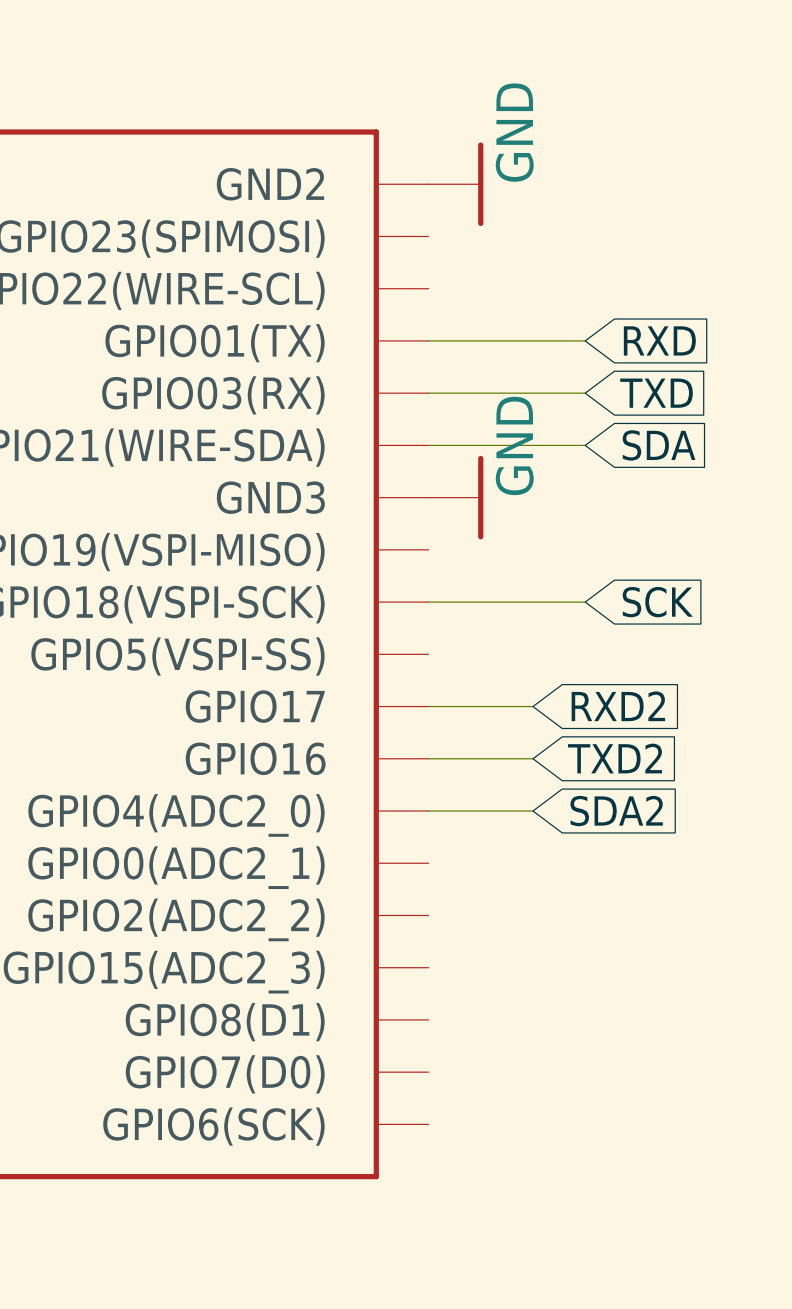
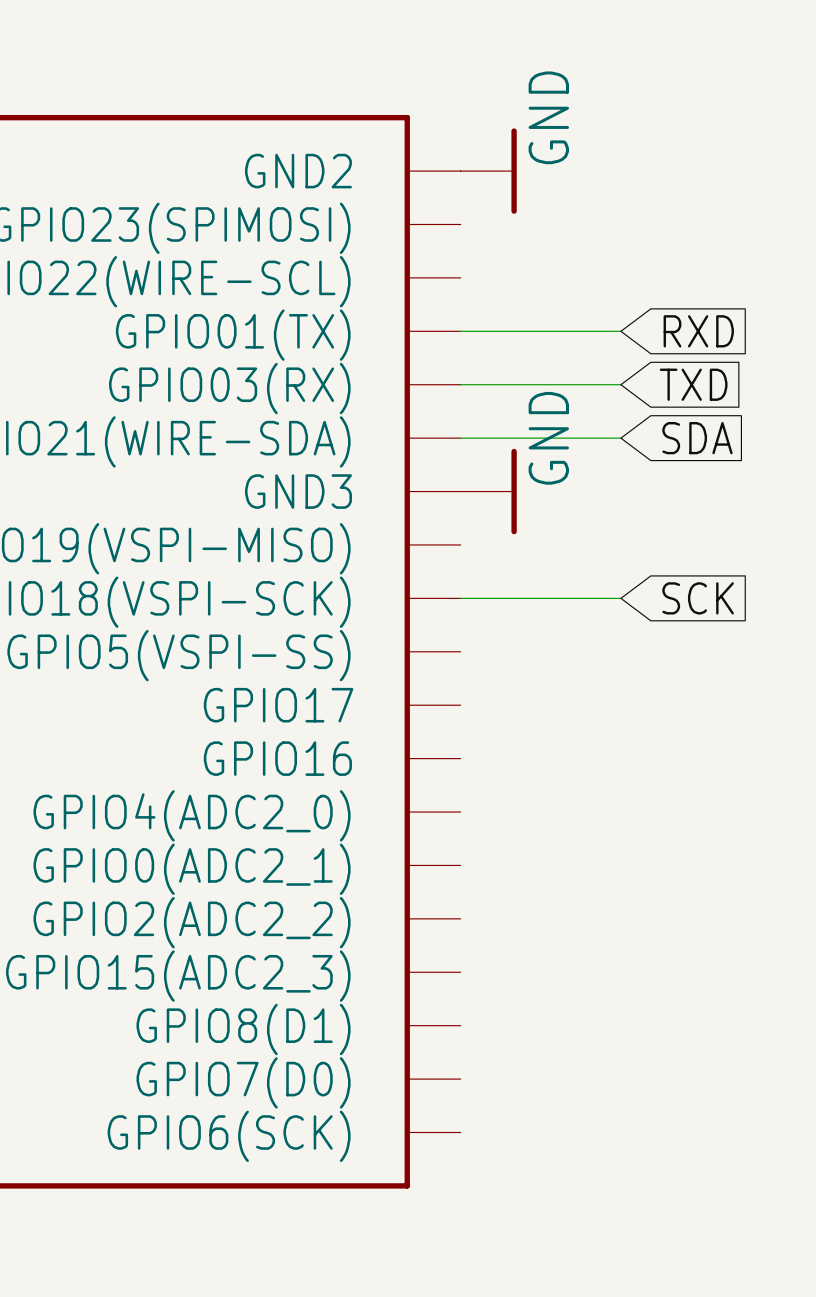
wire: (428, 706) (532, 706) -> none
global label: RXD2 (618, 706) -> none
wire: (428, 758) (532, 758) -> none
global label: TXD2 (615, 758) -> none
wire: (428, 811) (532, 811) -> none
global label: SDA2 (616, 811) -> none

